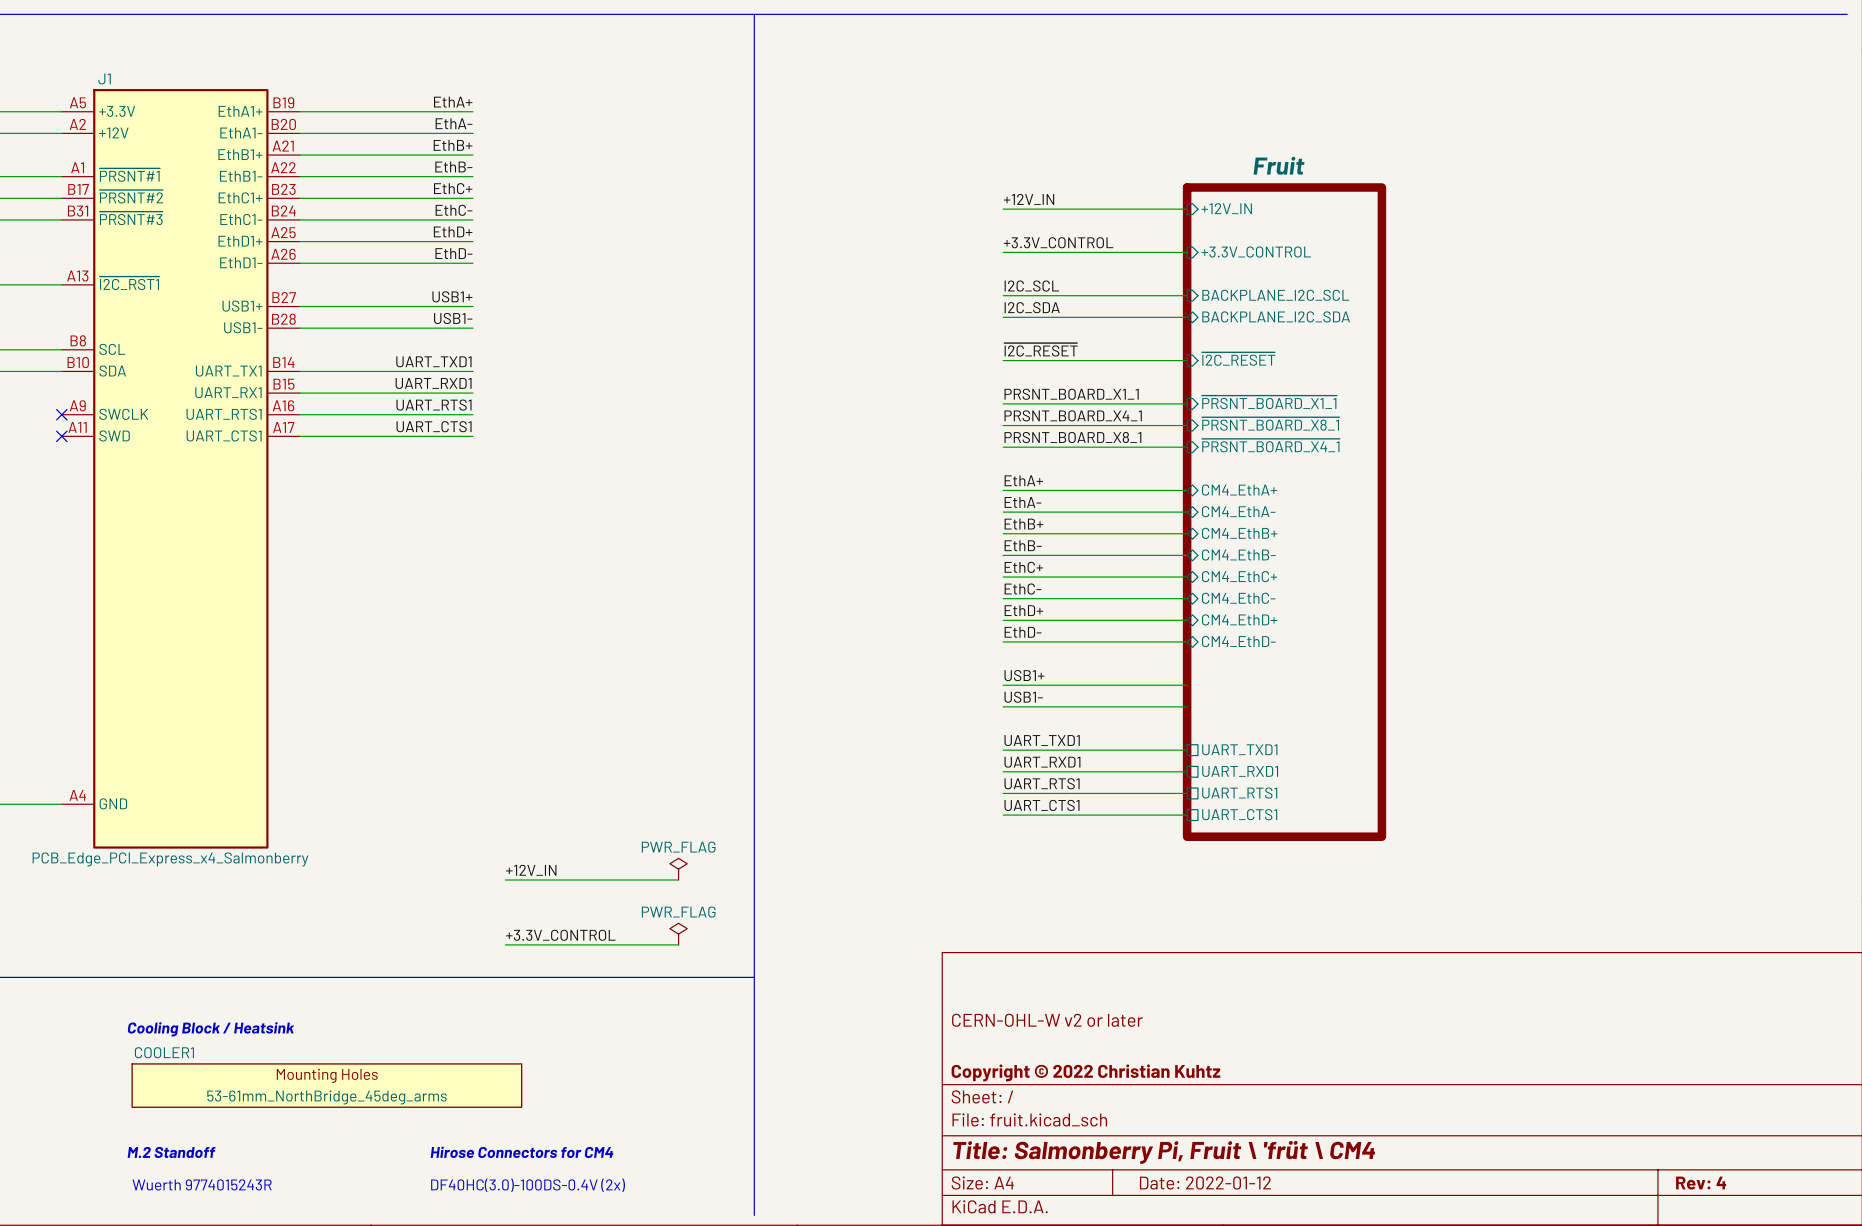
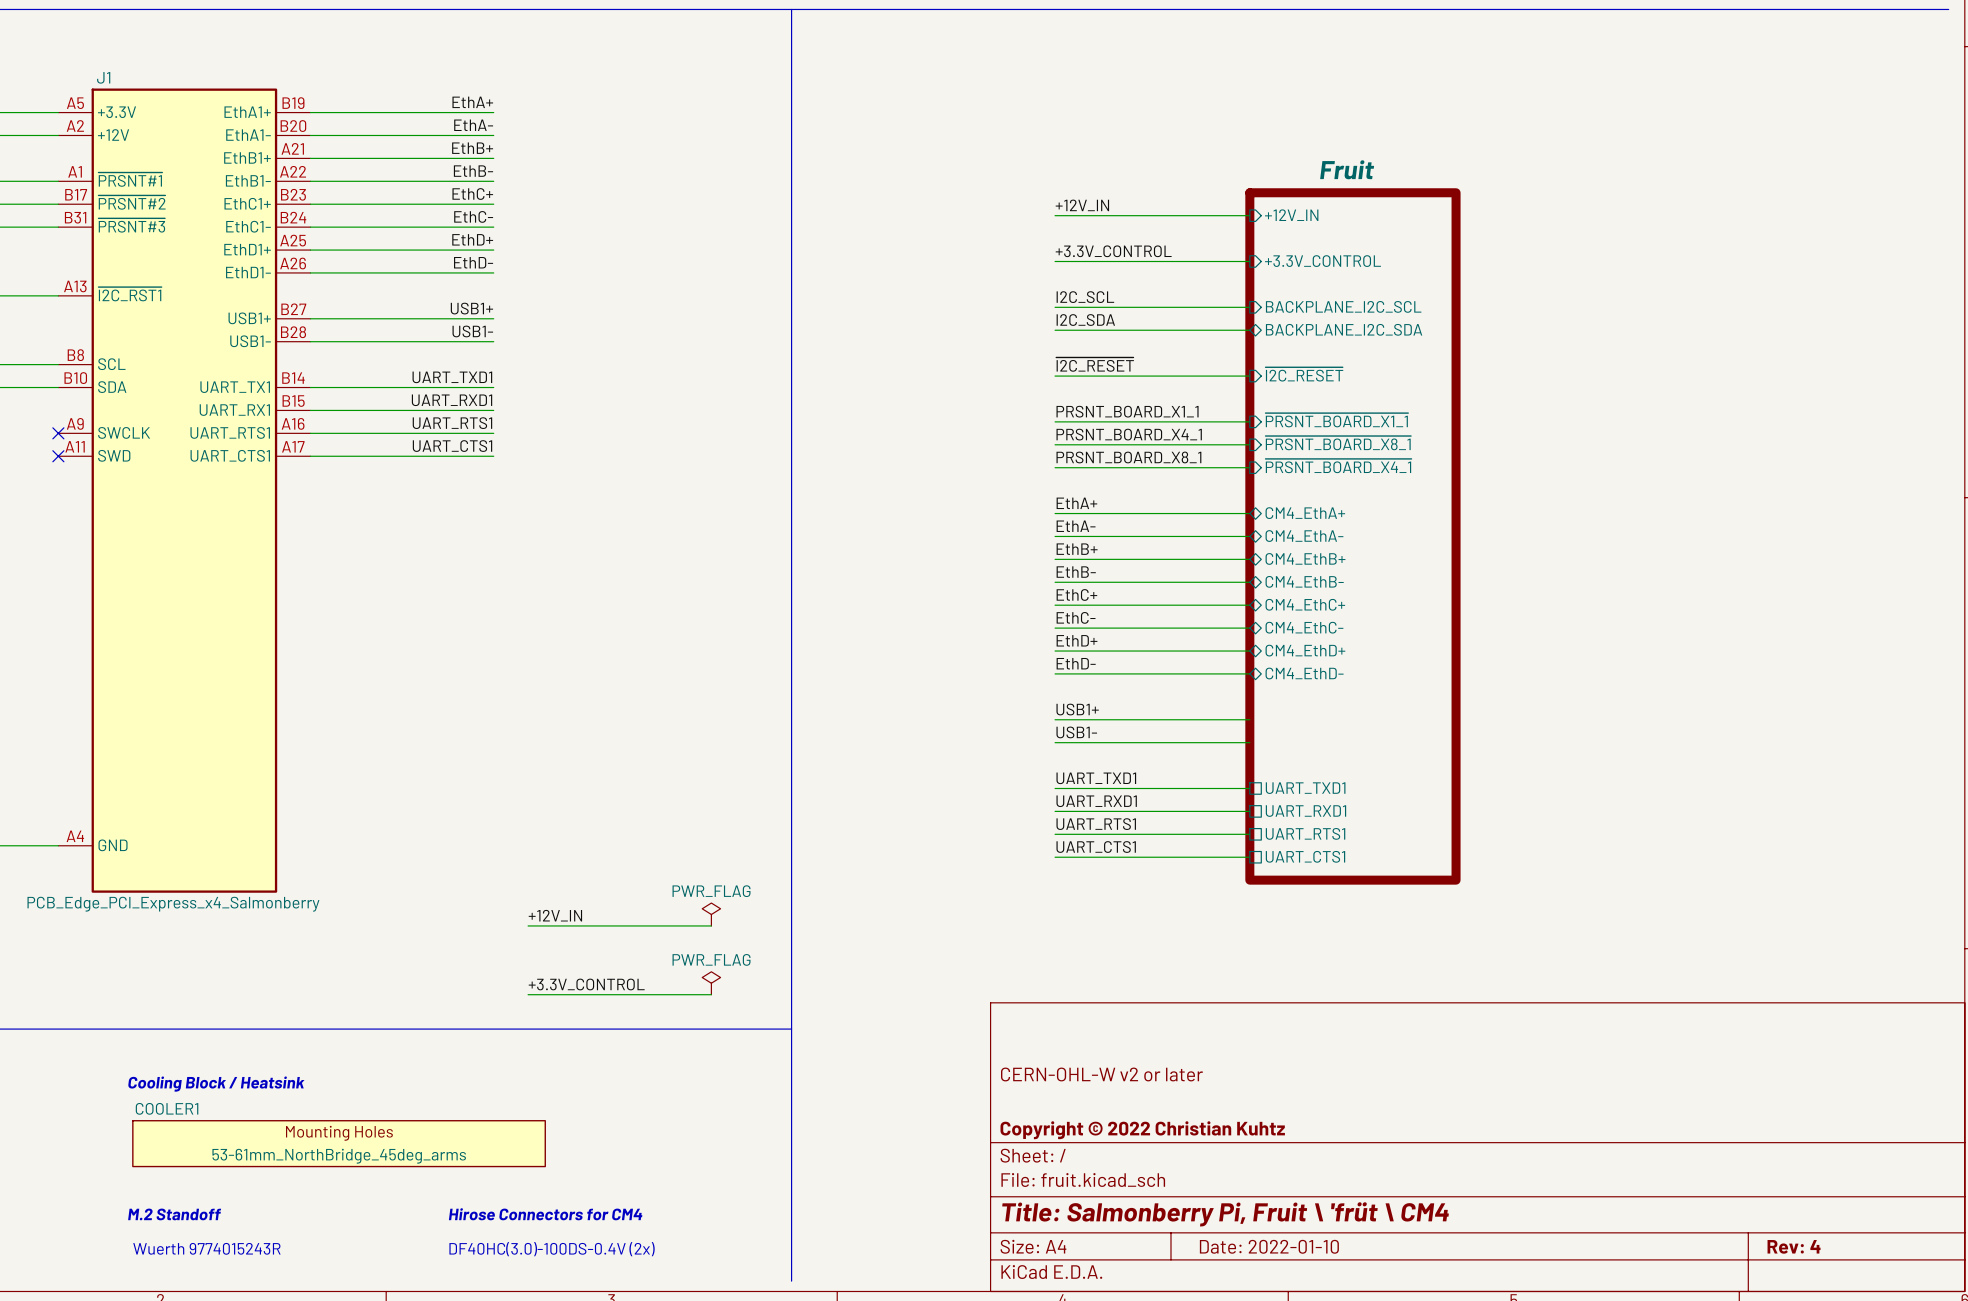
title block: Date: 2022-01-12 (1205, 1183) -> Date: 2022-01-10 (1269, 1246)

